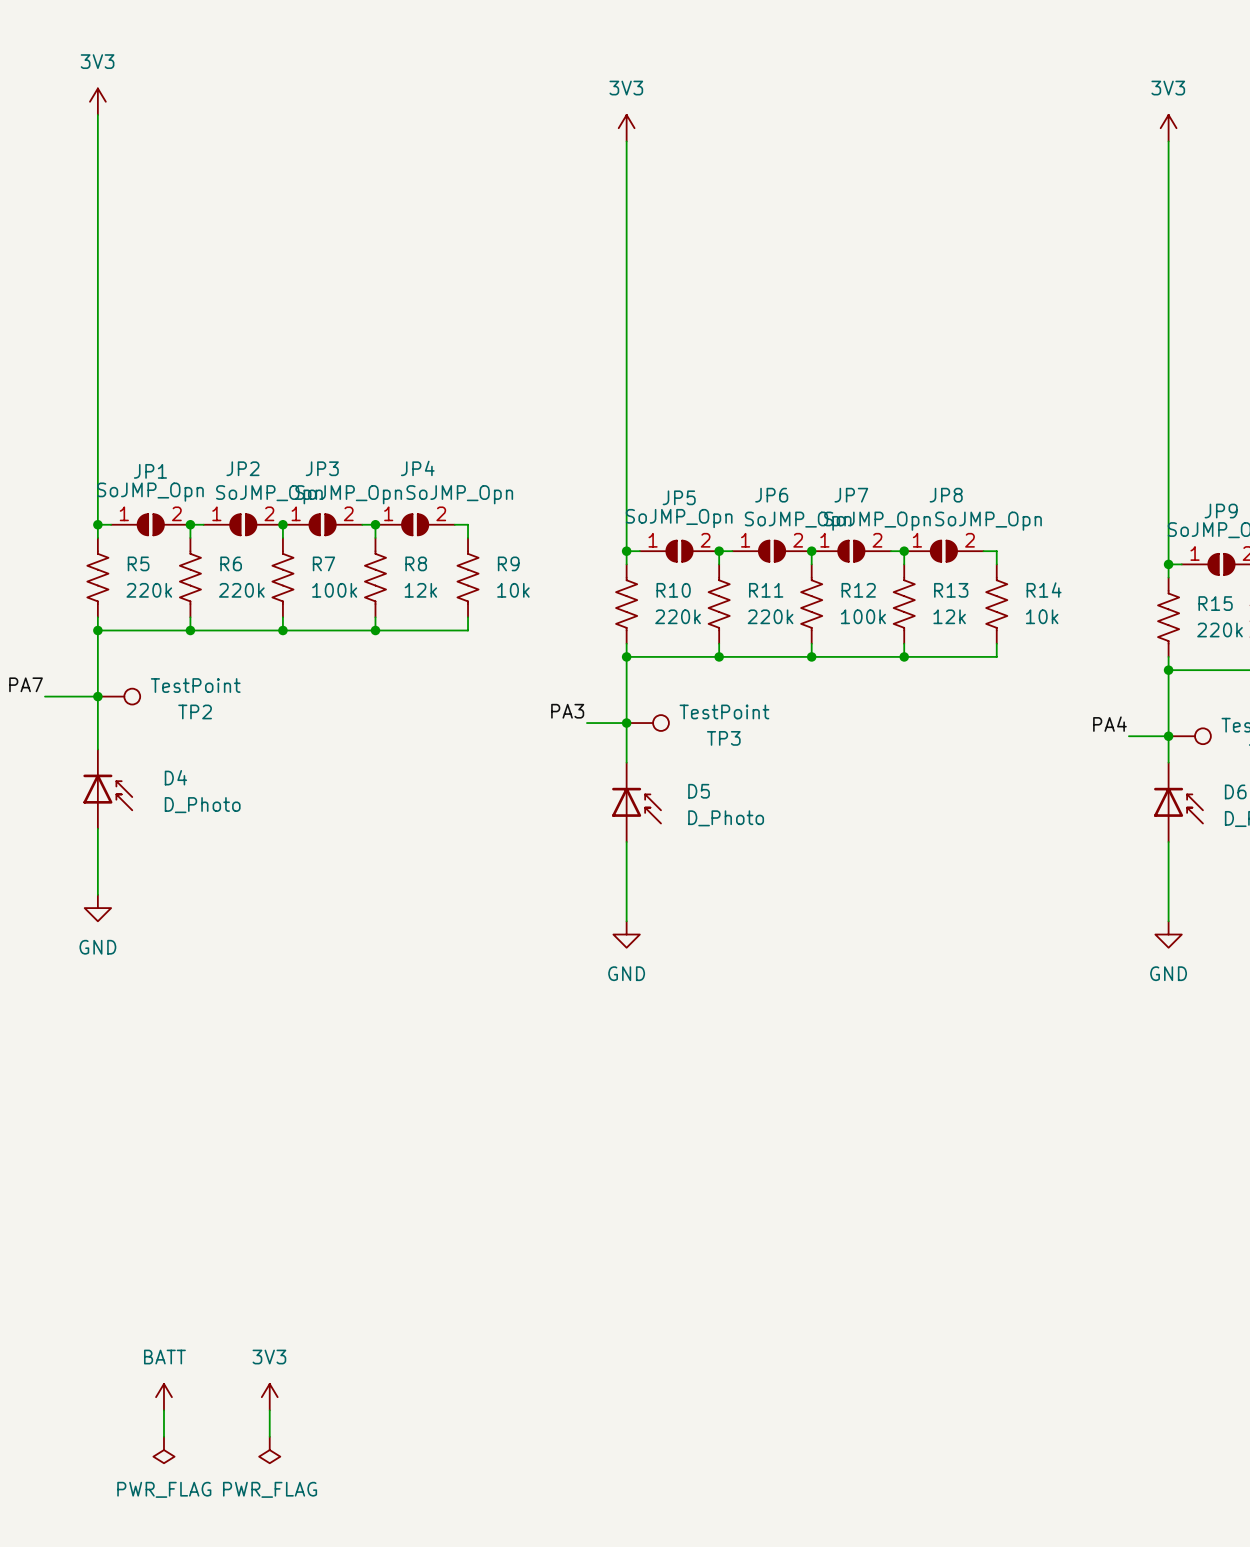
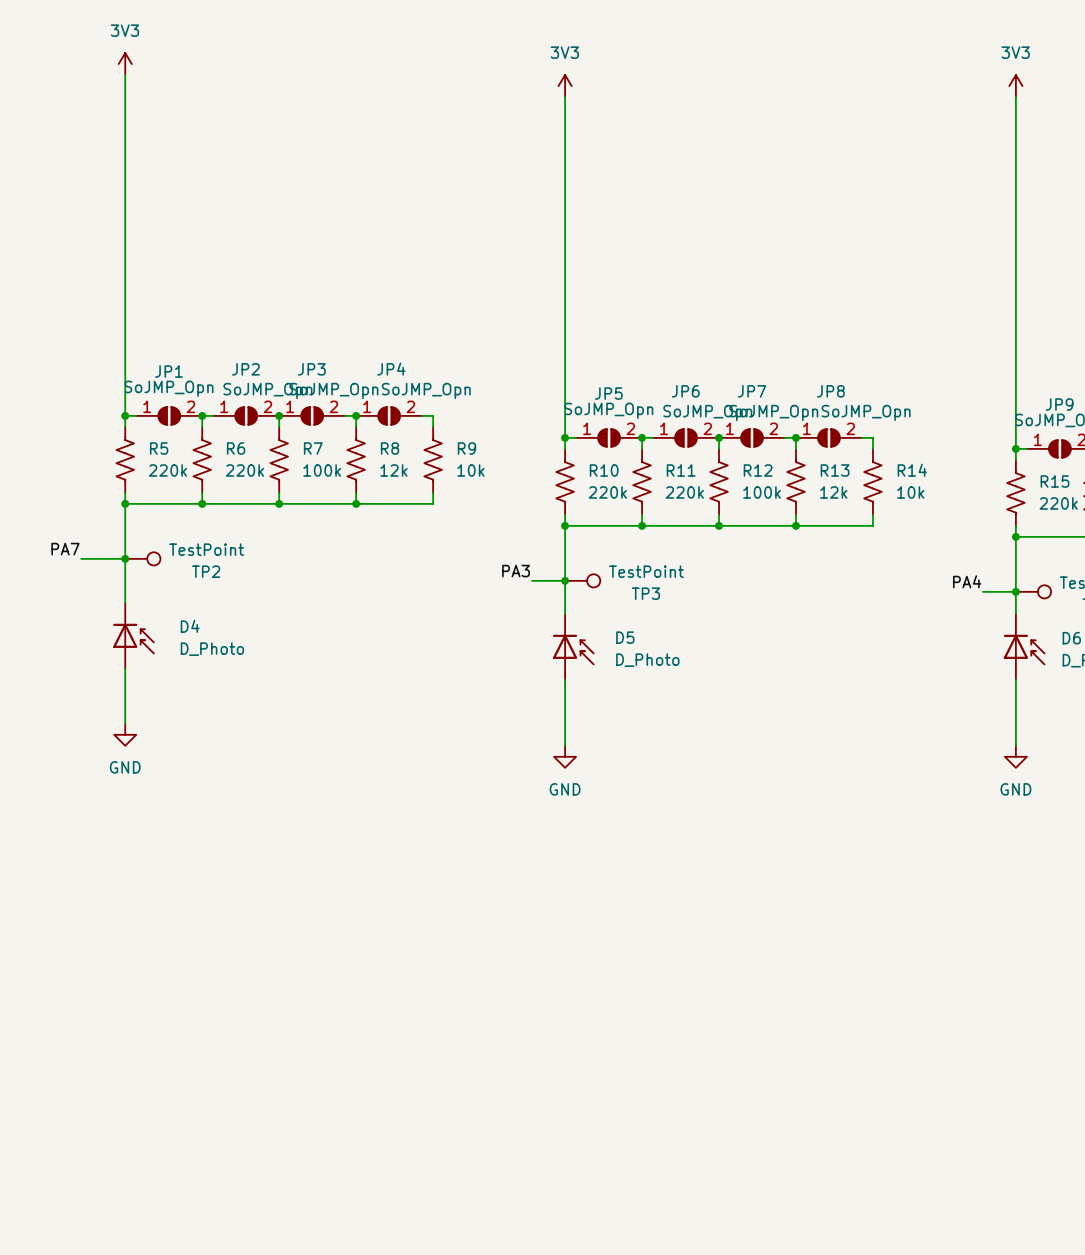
power symbol: BATT (163, 1397) -> none
power symbol: 3V3 (269, 1397) -> none
wire: (163, 1410) (163, 1436) -> none
wire: (269, 1410) (269, 1436) -> none
power symbol: PWR_FLAG (163, 1450) -> none
power symbol: PWR_FLAG (269, 1450) -> none

